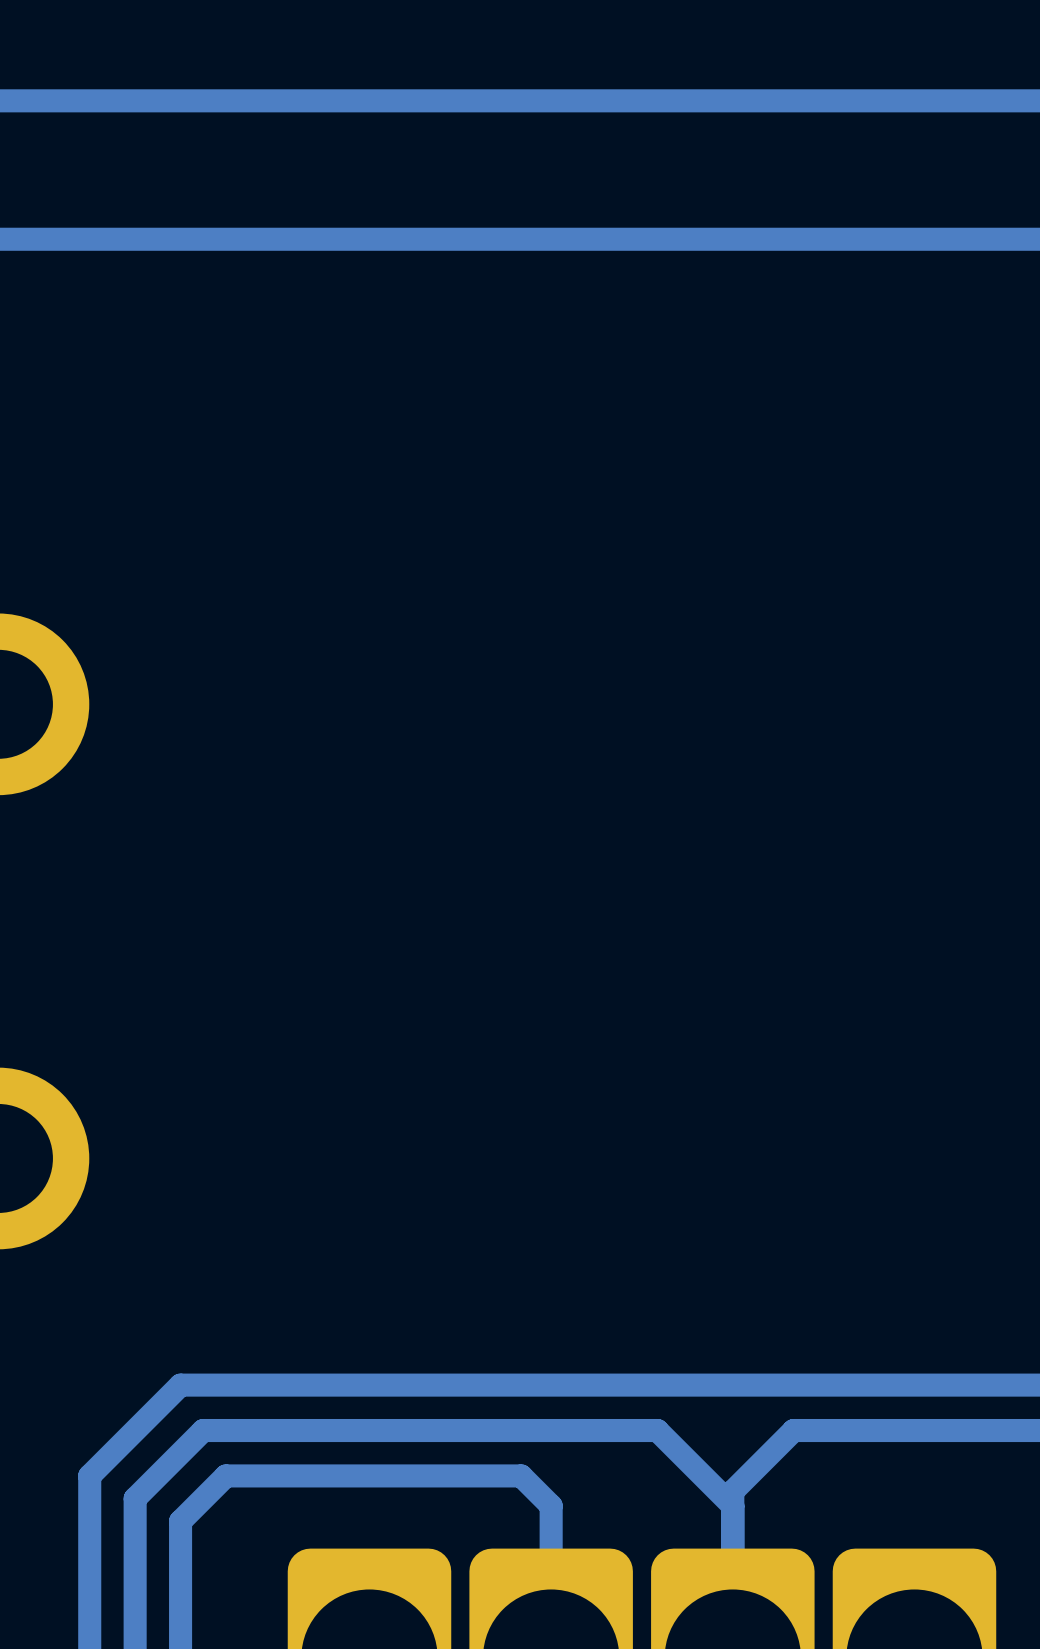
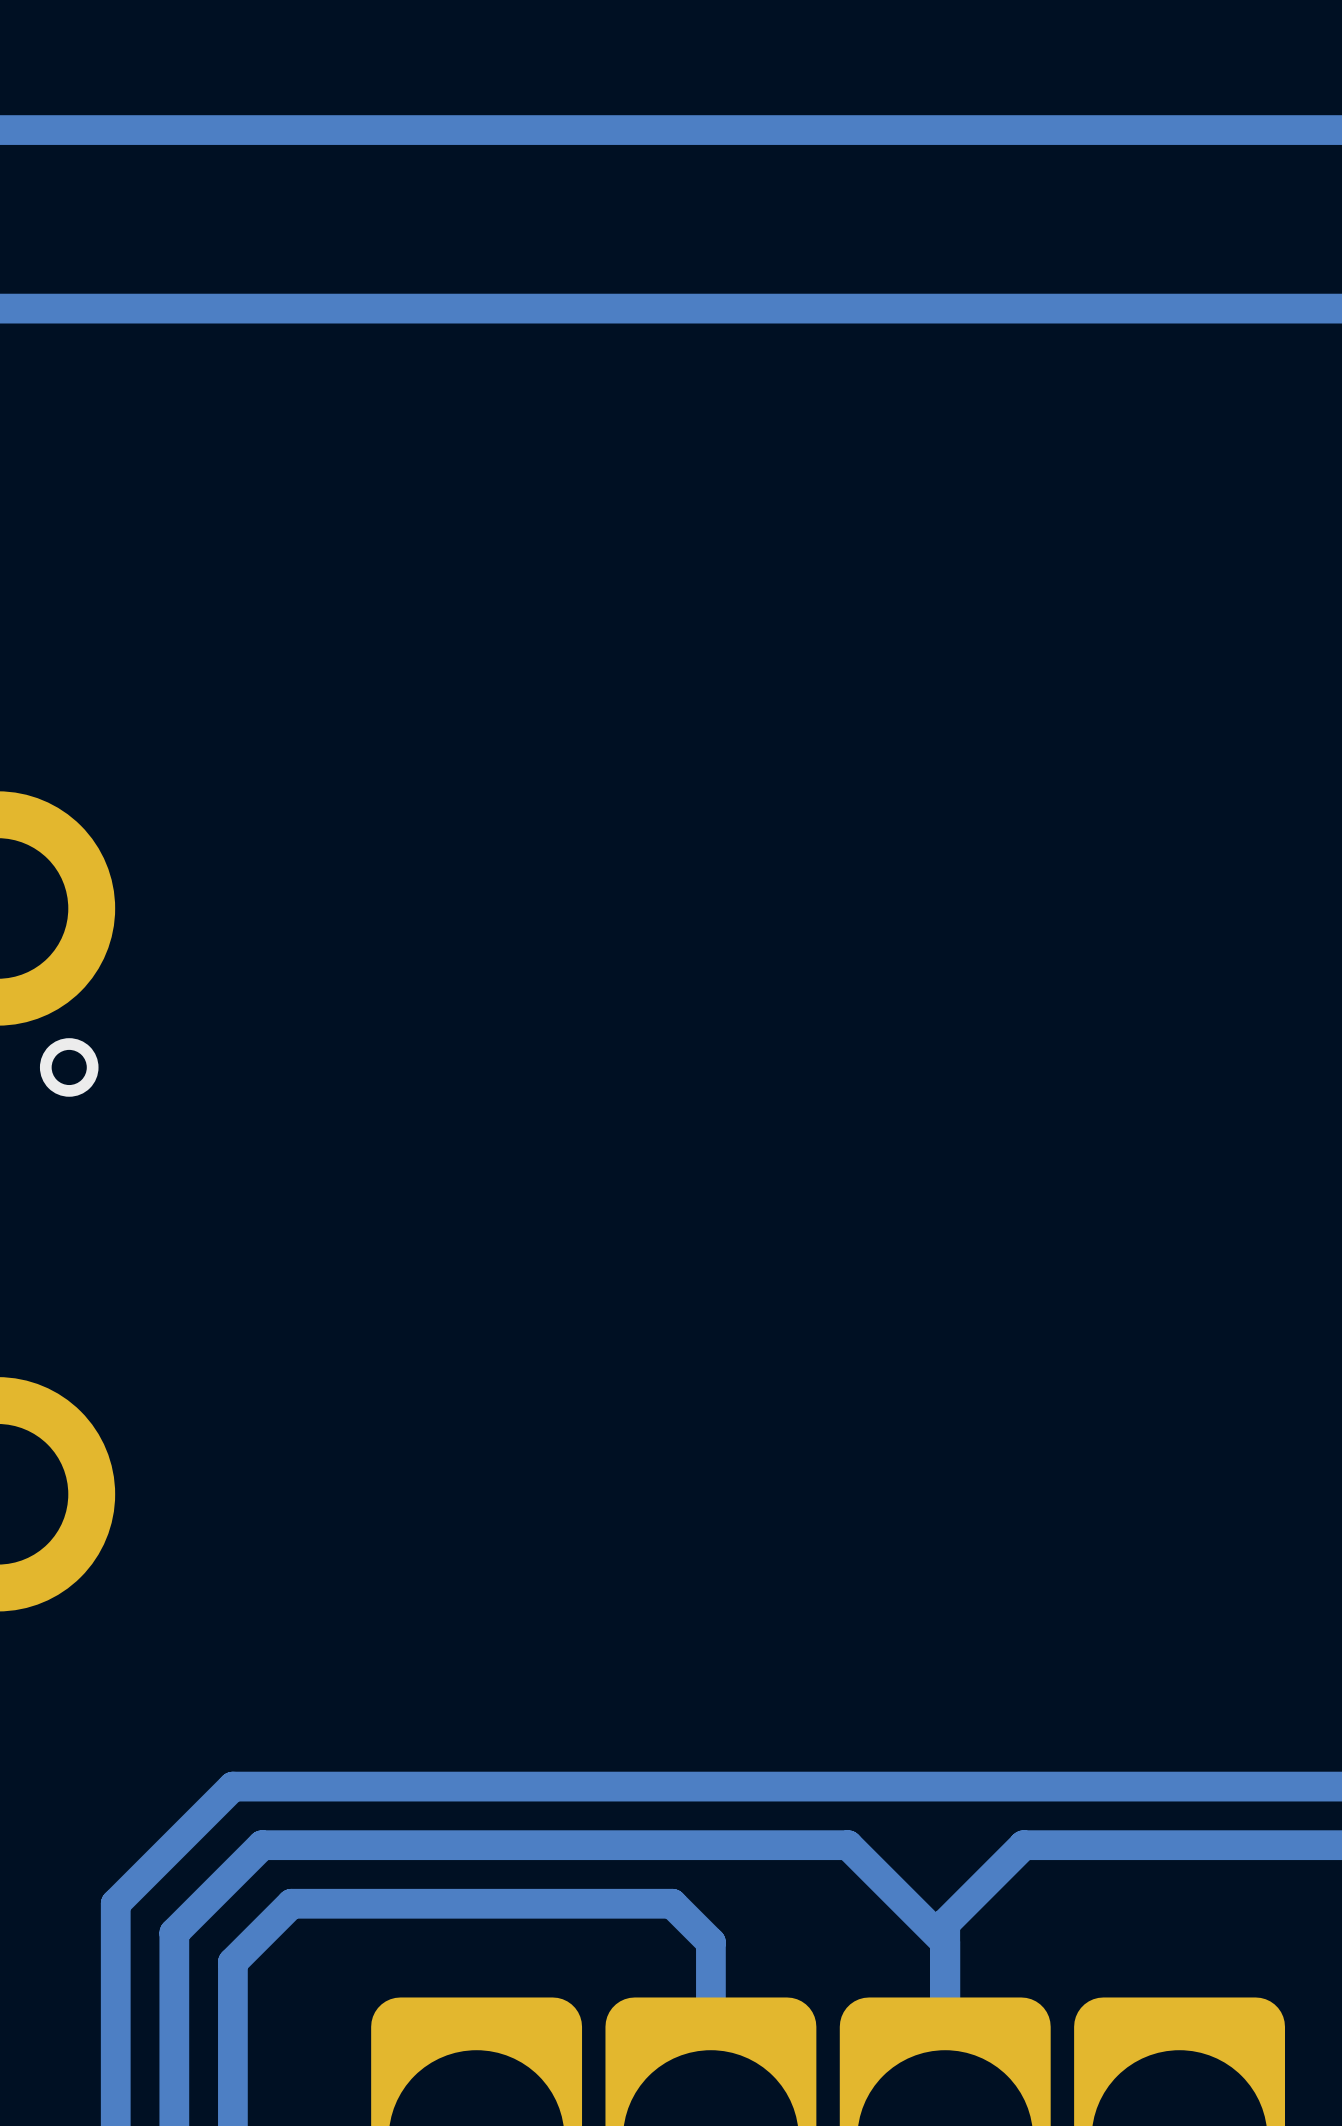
via: none -> (69, 1067)

